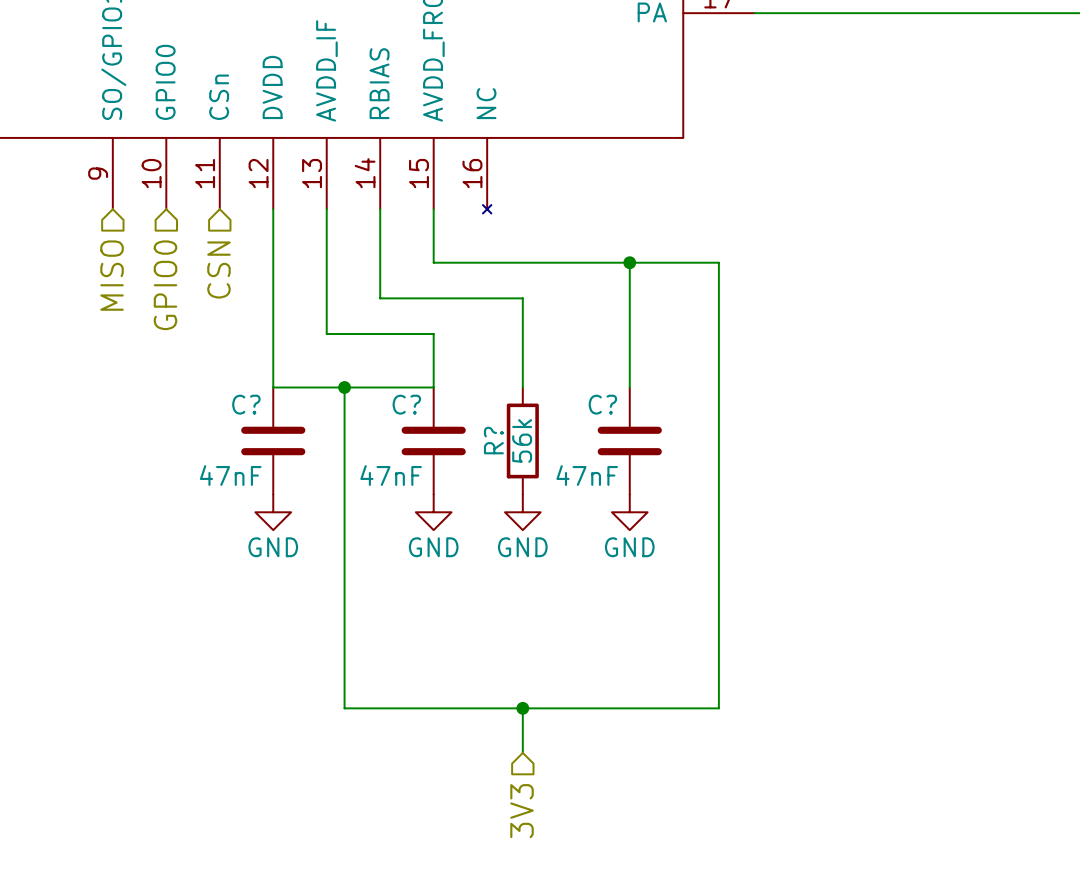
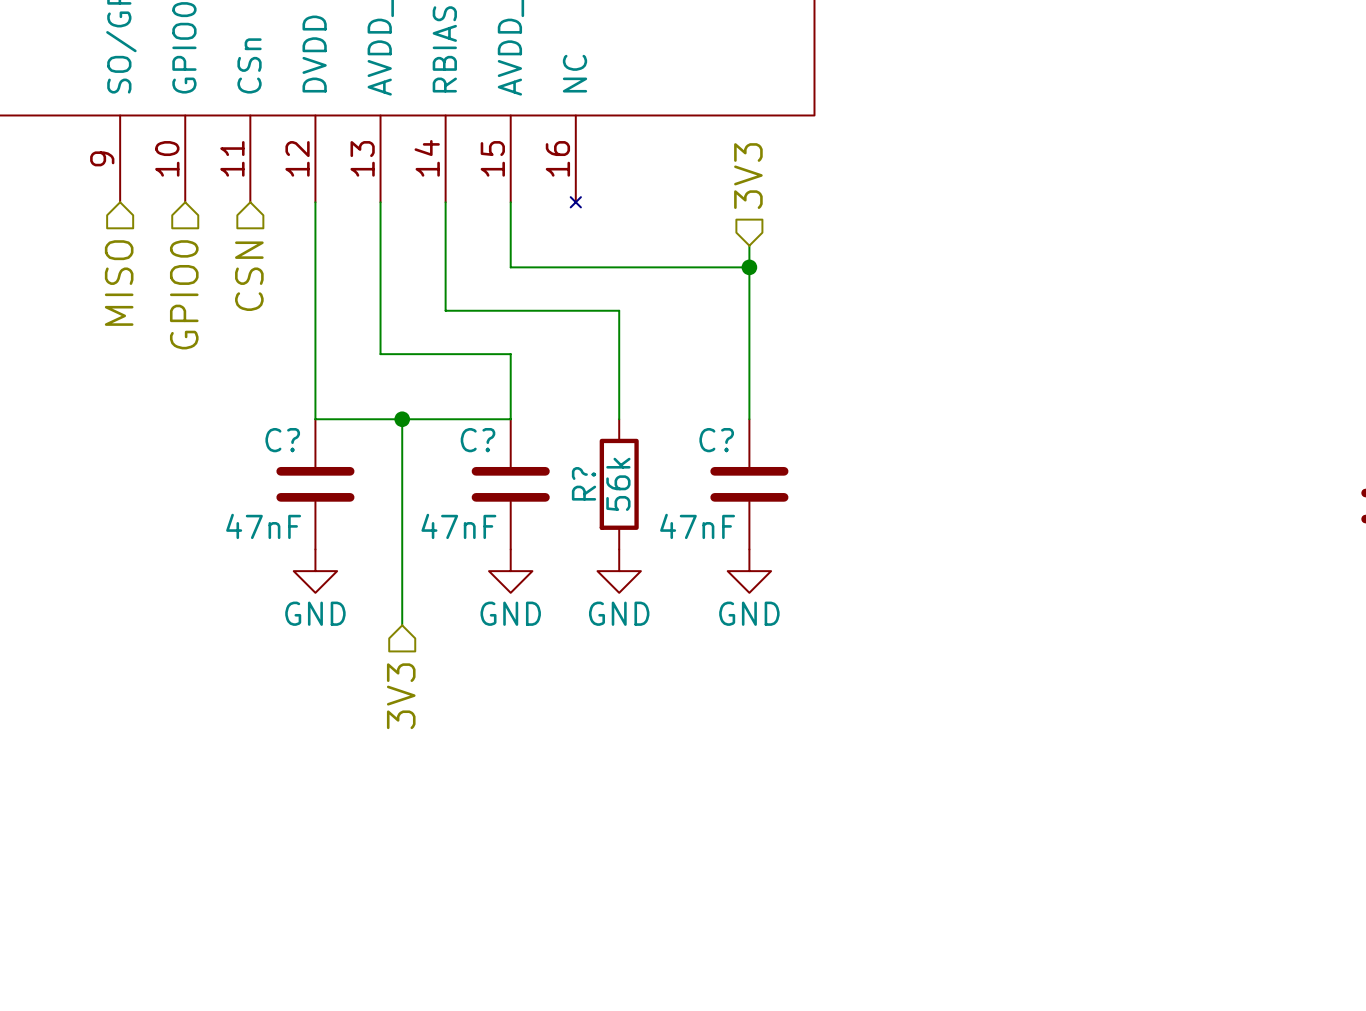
hierarchical label: none -> 3V3 (748, 176)
wire: (629, 262) (718, 262) (718, 708) (344, 708) (344, 556) -> (749, 267) (749, 245)
wire: (522, 708) (522, 752) -> none
junction: (522, 708) -> none
hierarchical label position: 3V3 (522, 811) -> 3V3 (401, 696)

